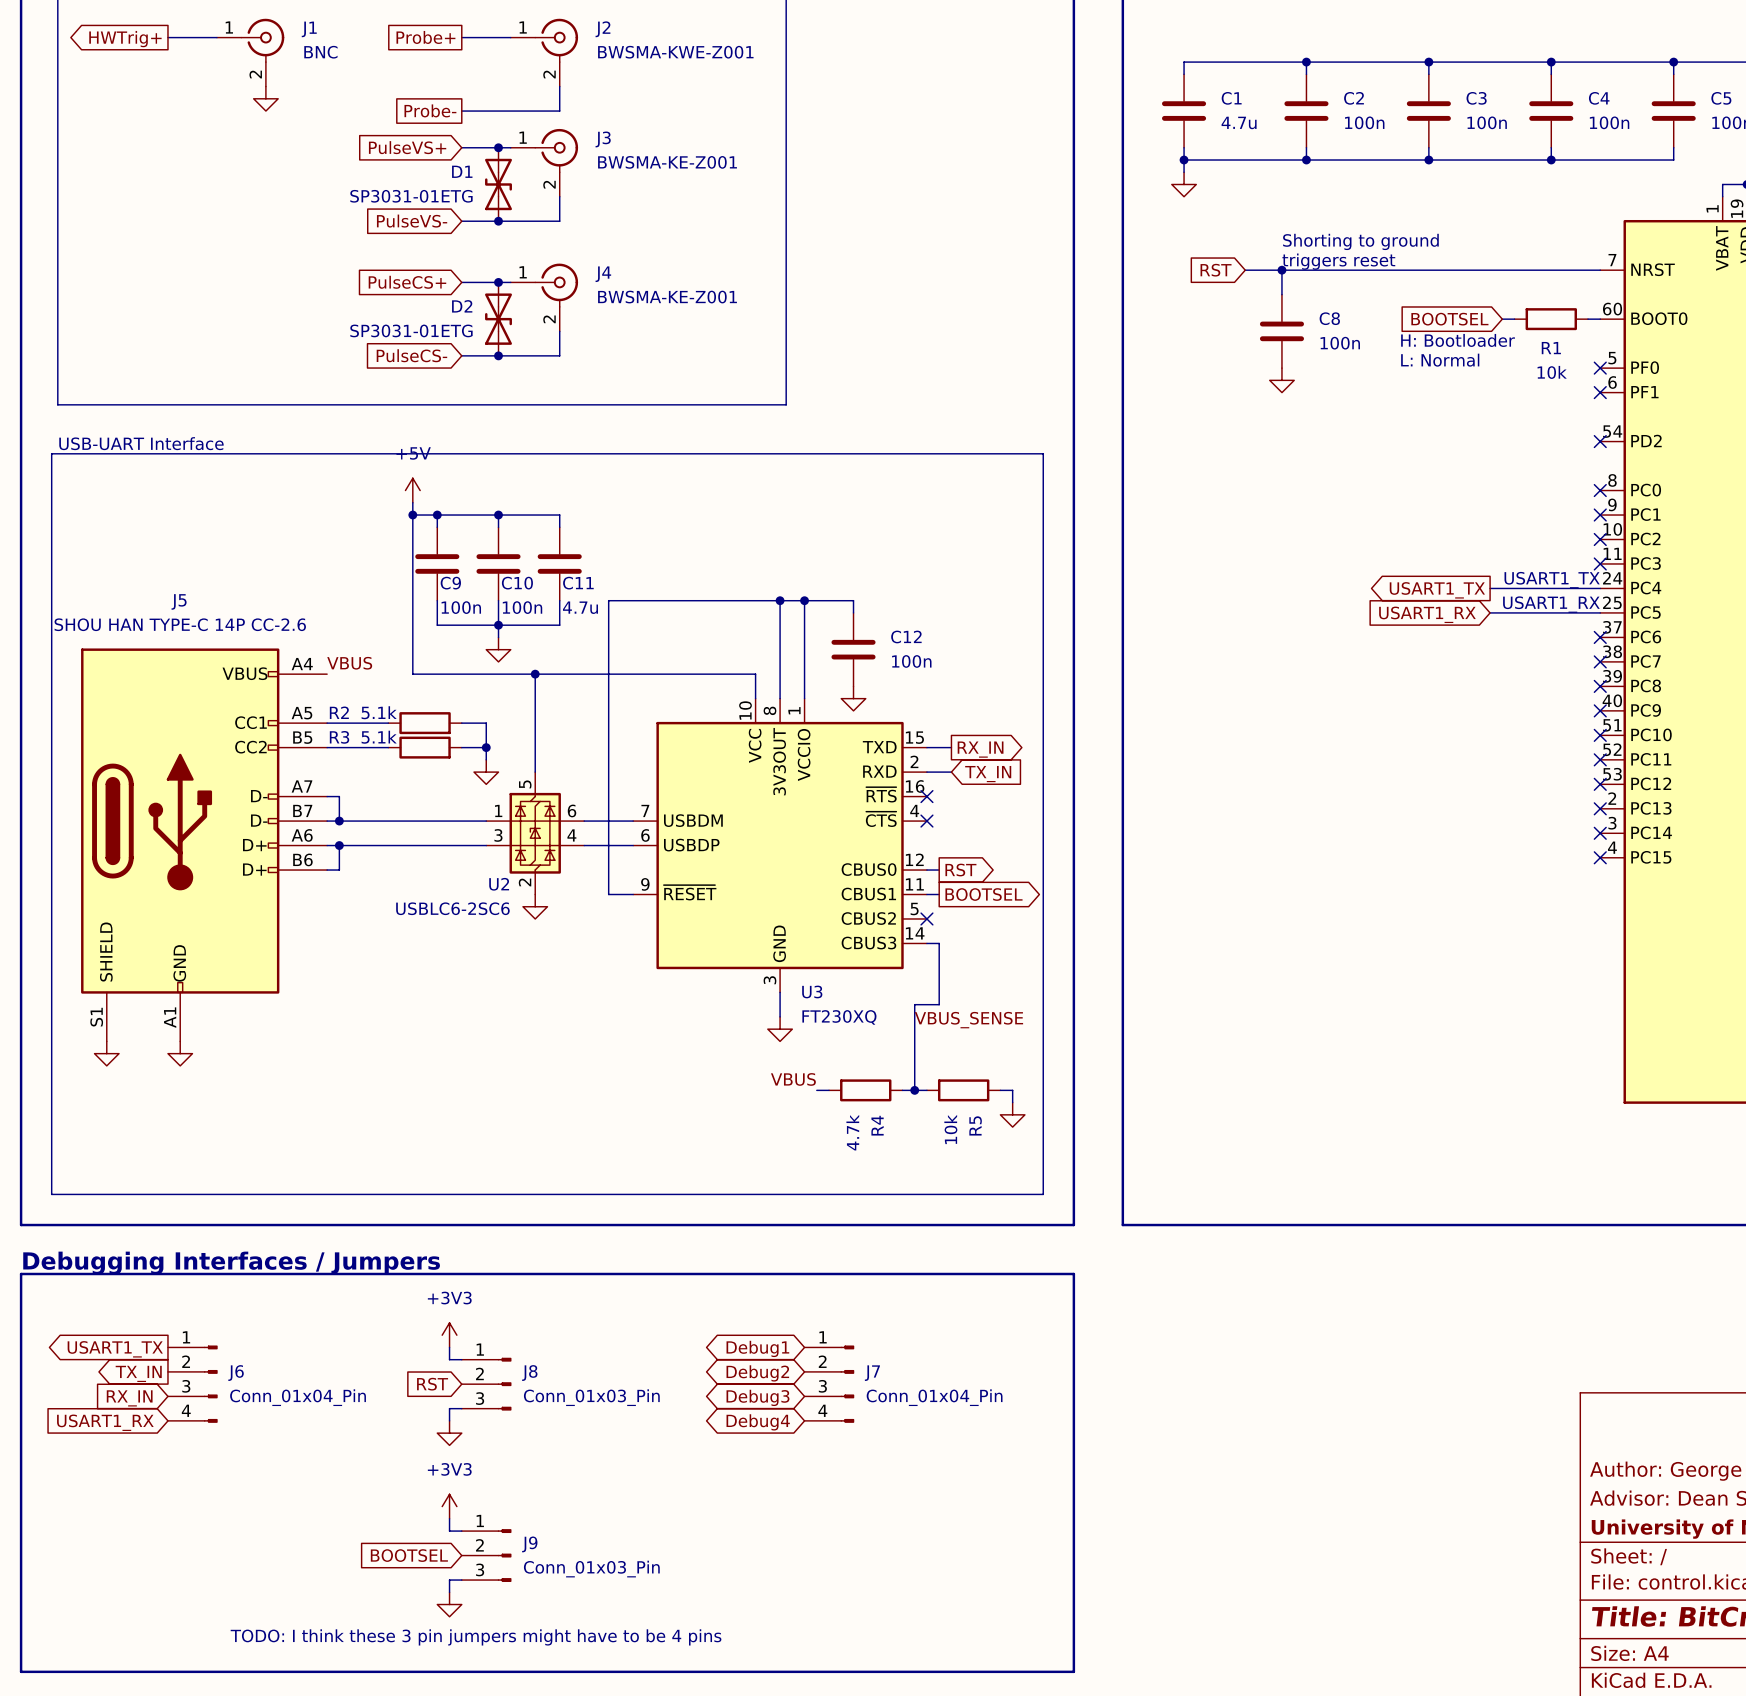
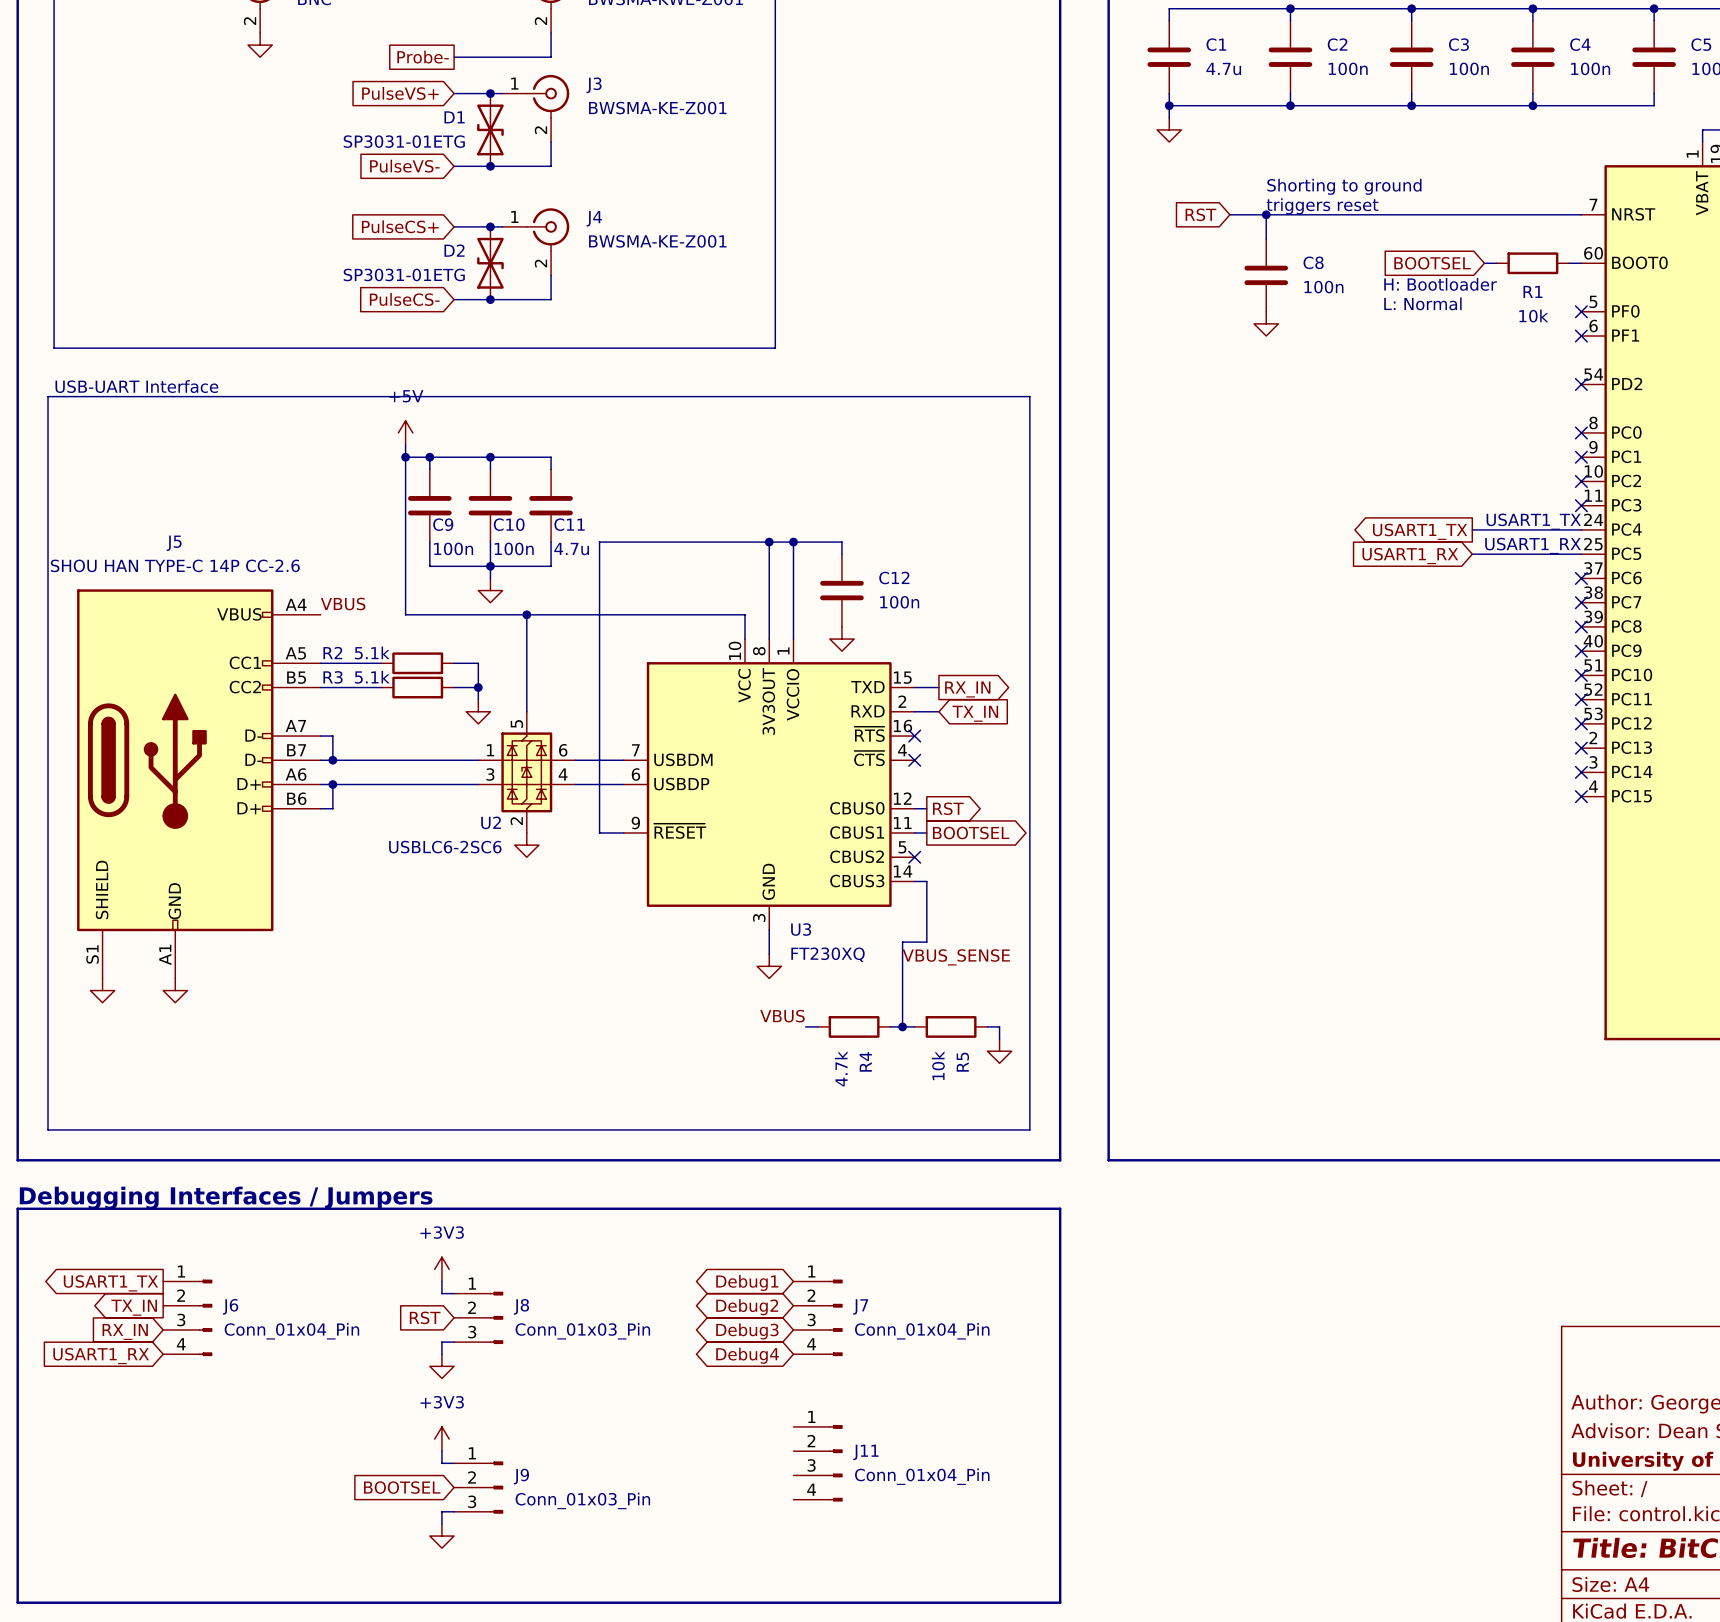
J11: none -> Conn_01x04_Pin (818, 1463)
text: TODO: I think these 3 pin jumpers might have to be 4 pins (476, 1637) -> none

